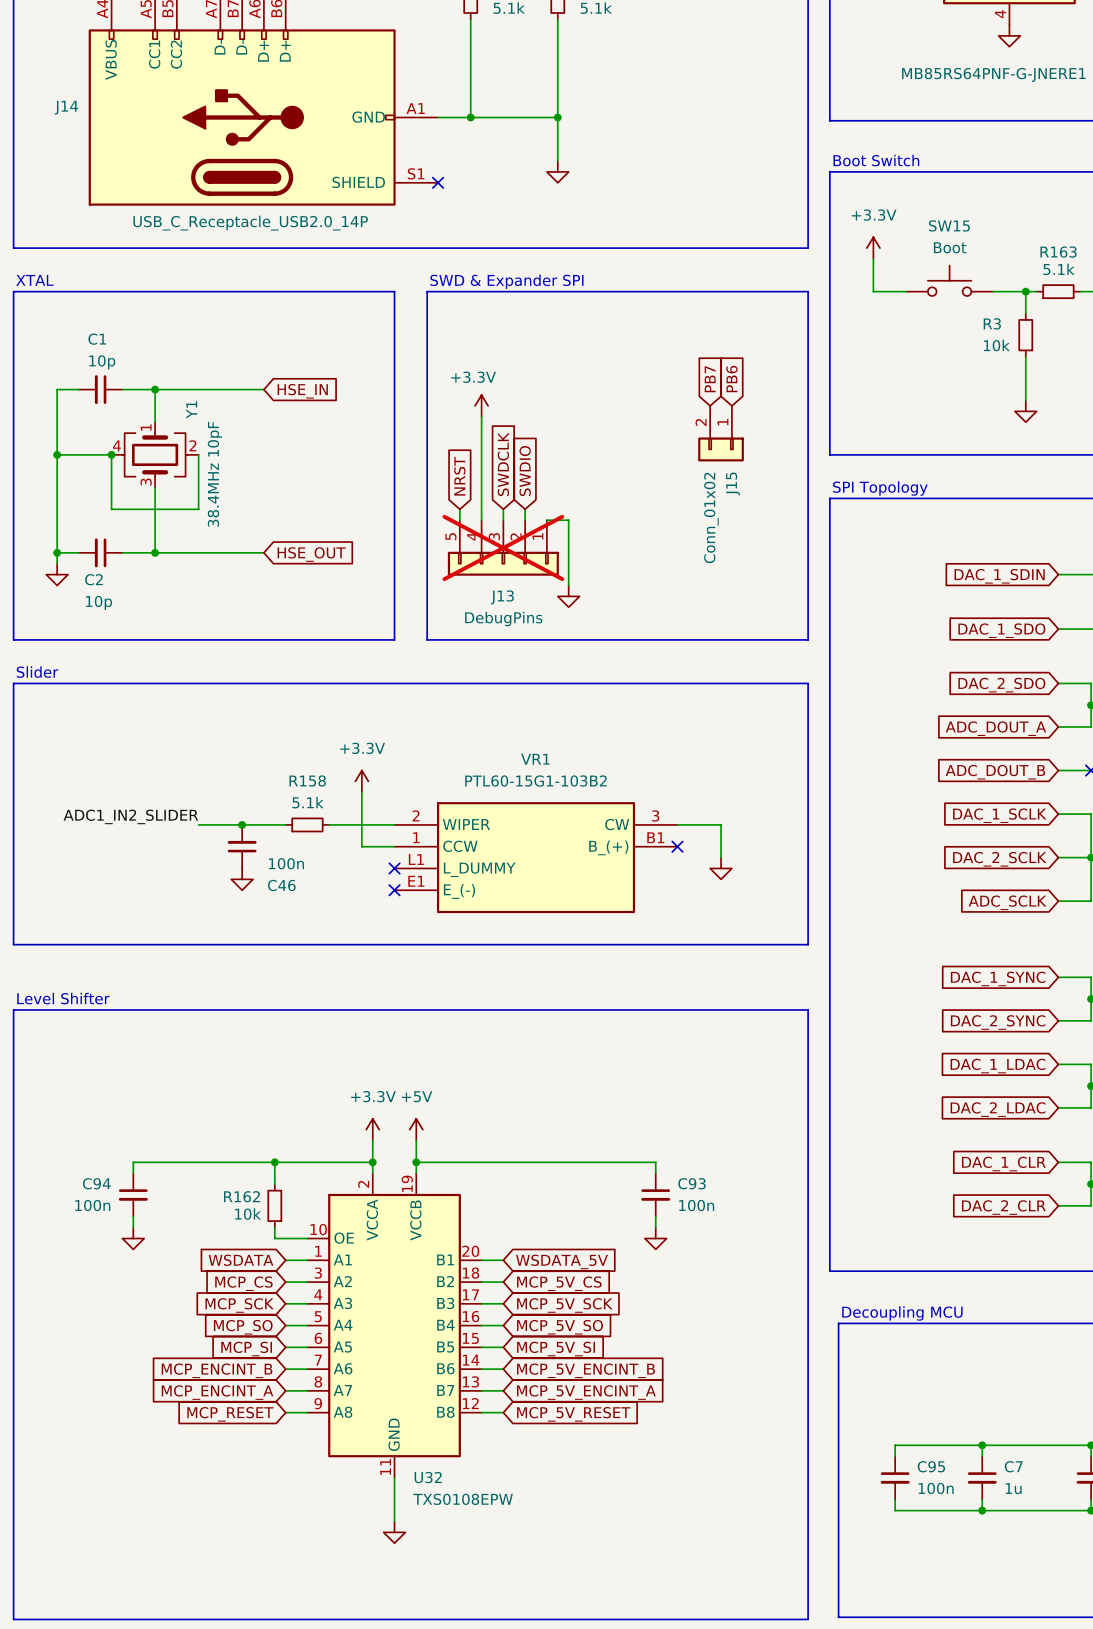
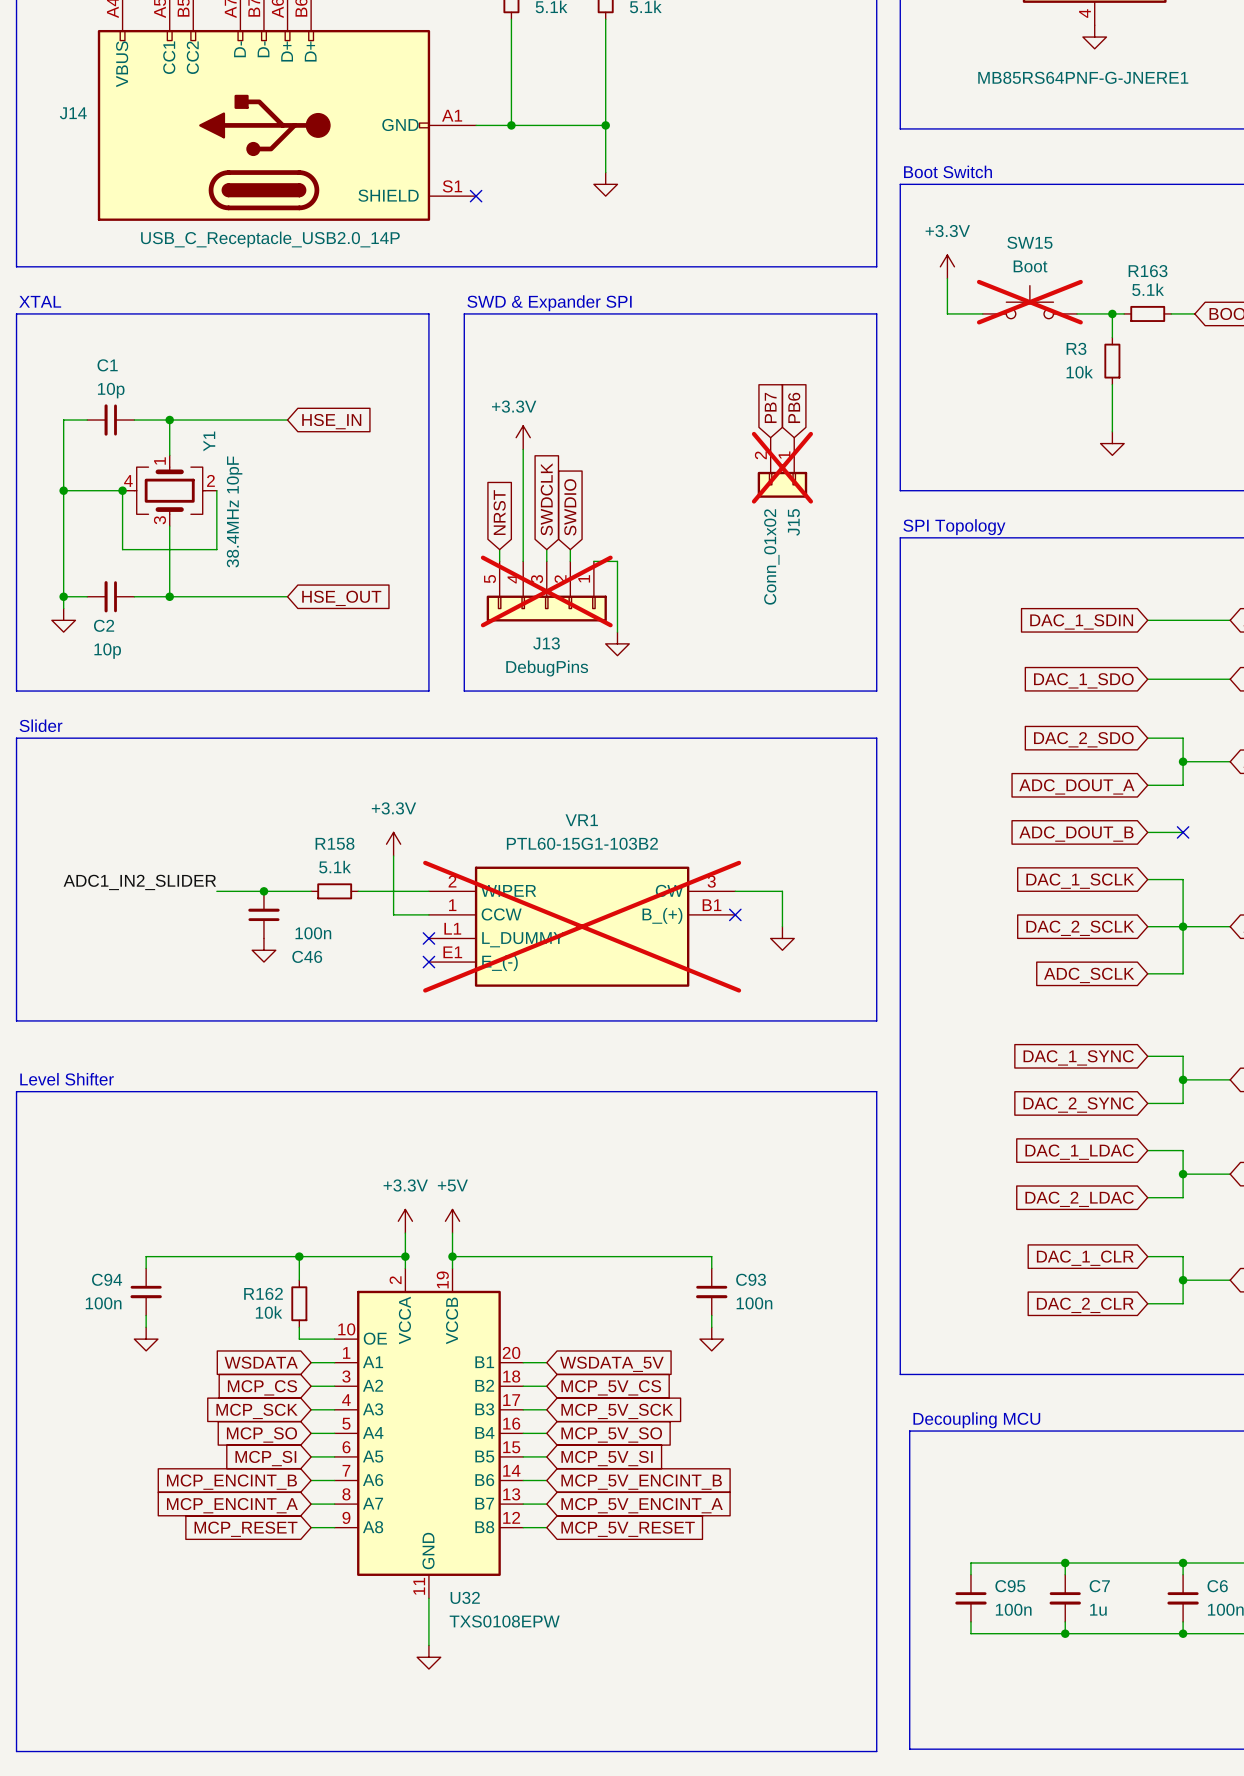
SW15 do-not-place cross: none -> (1029, 302)
J15 do-not-place cross: none -> (782, 467)
VR1 do-not-place cross: none -> (582, 926)

